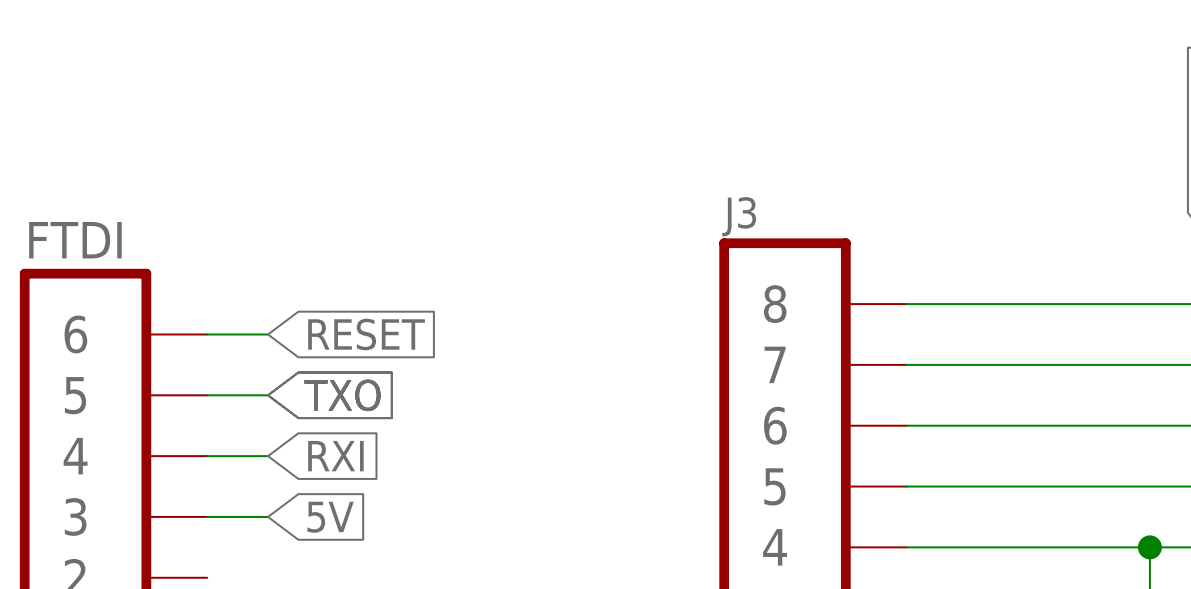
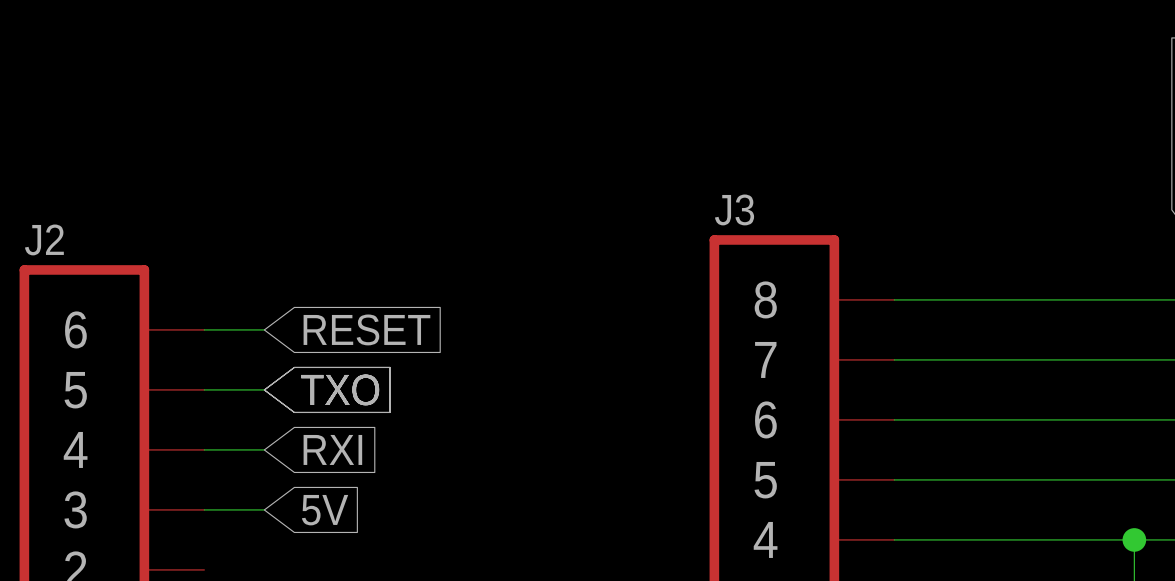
FTDI name: FTDI (75, 240) -> J2 (44, 239)

